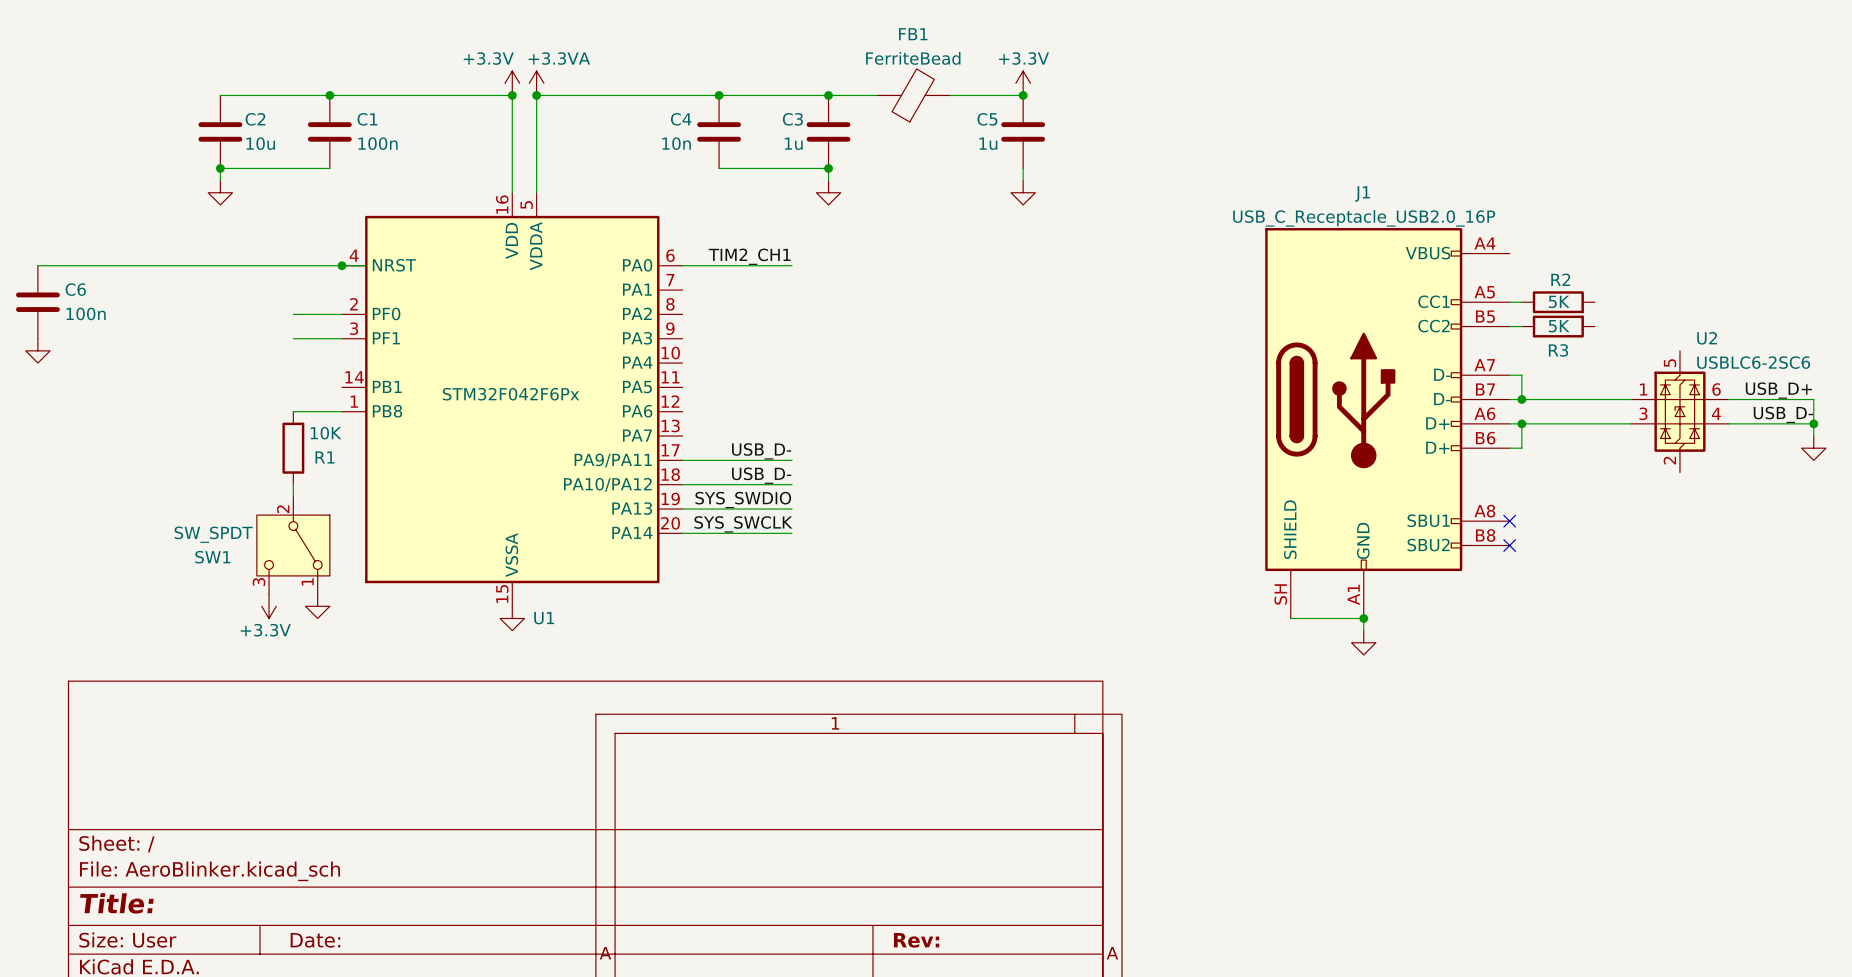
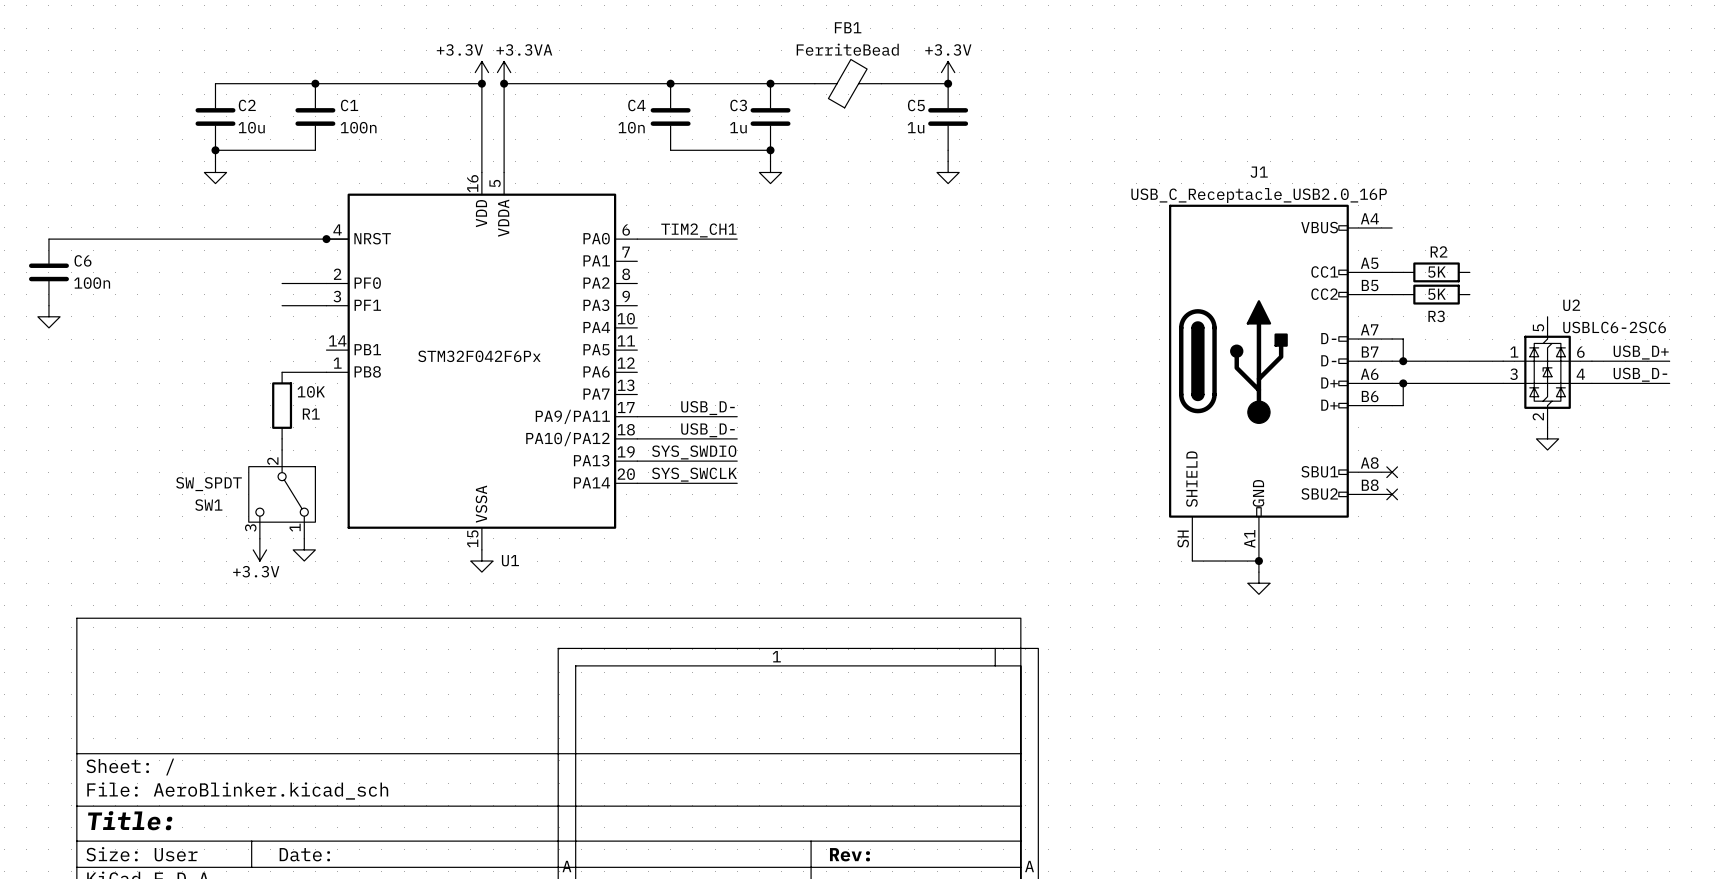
wire: (1813, 399) (1813, 436) -> none
junction: (1813, 423) -> none
power symbol position: (1813, 448) -> (1547, 438)

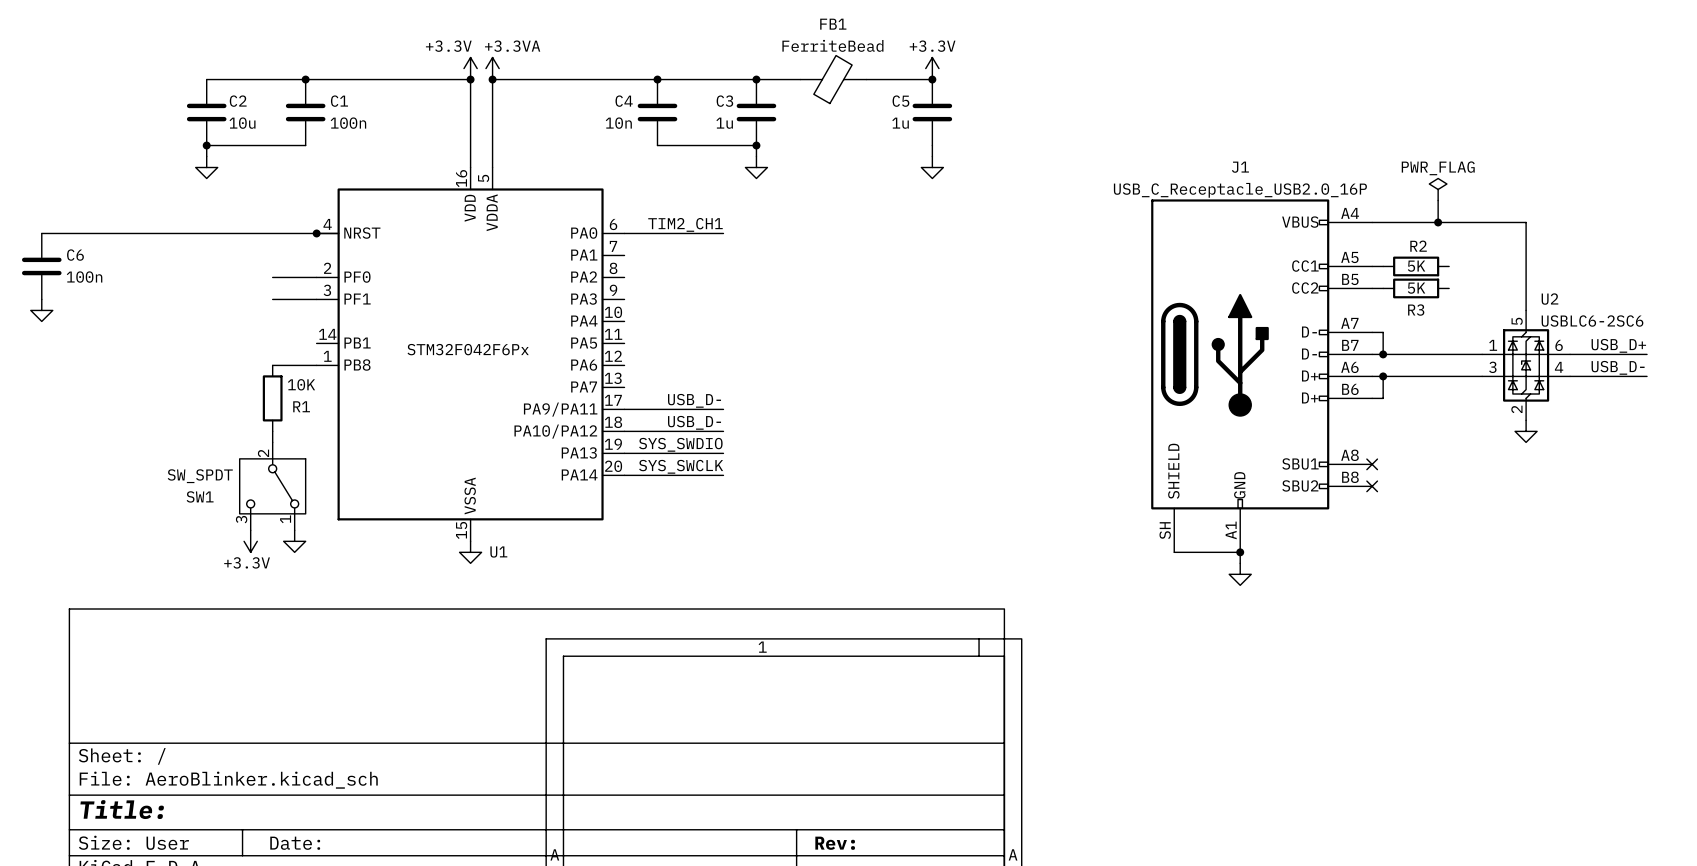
power symbol: none -> PWR_FLAG (1438, 189)
wire: none -> (1438, 200) (1438, 222)
wire: none -> (1372, 222) (1526, 222) (1526, 310)
junction: none -> (1438, 222)

